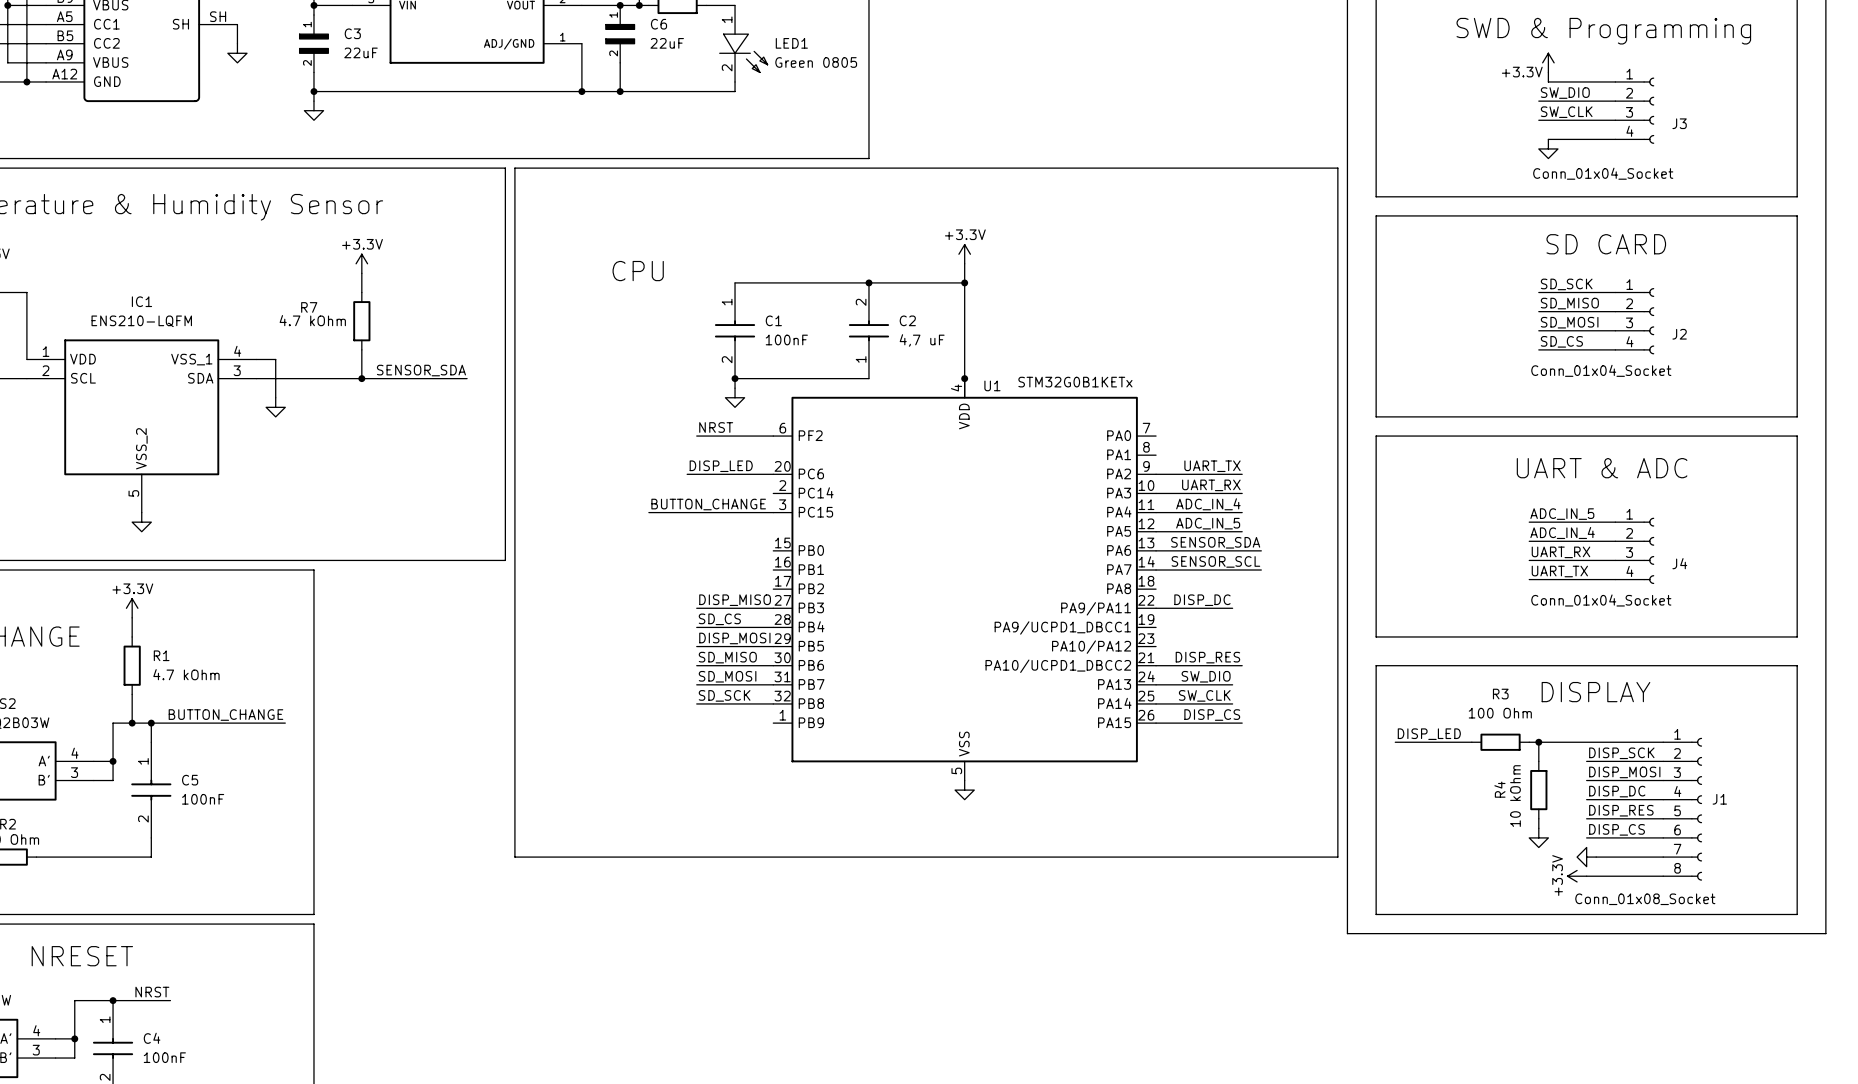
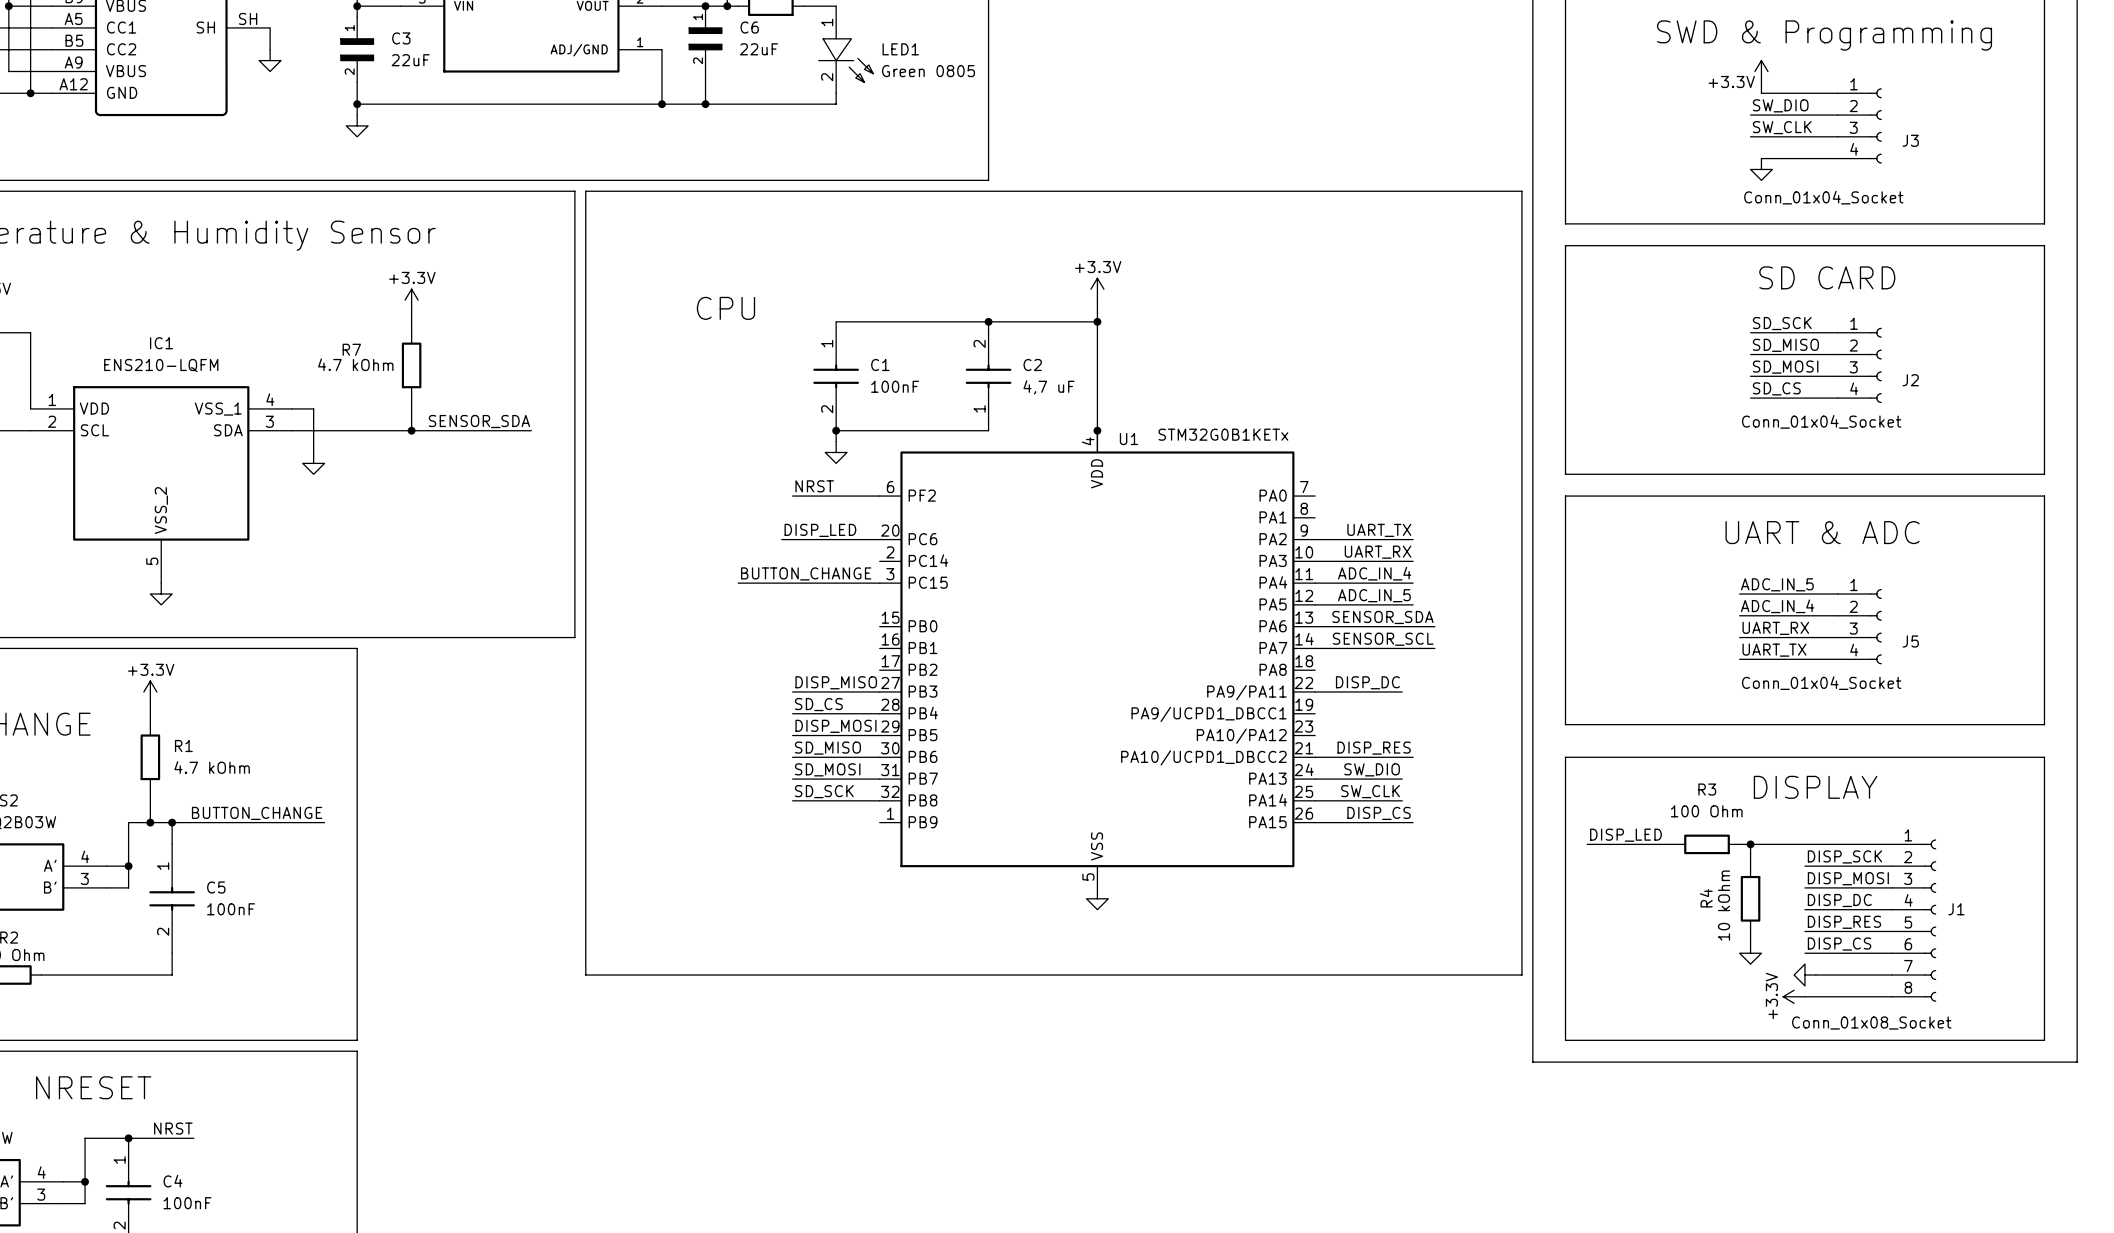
J4 name: J4 (1679, 563) -> J5 (1910, 641)

